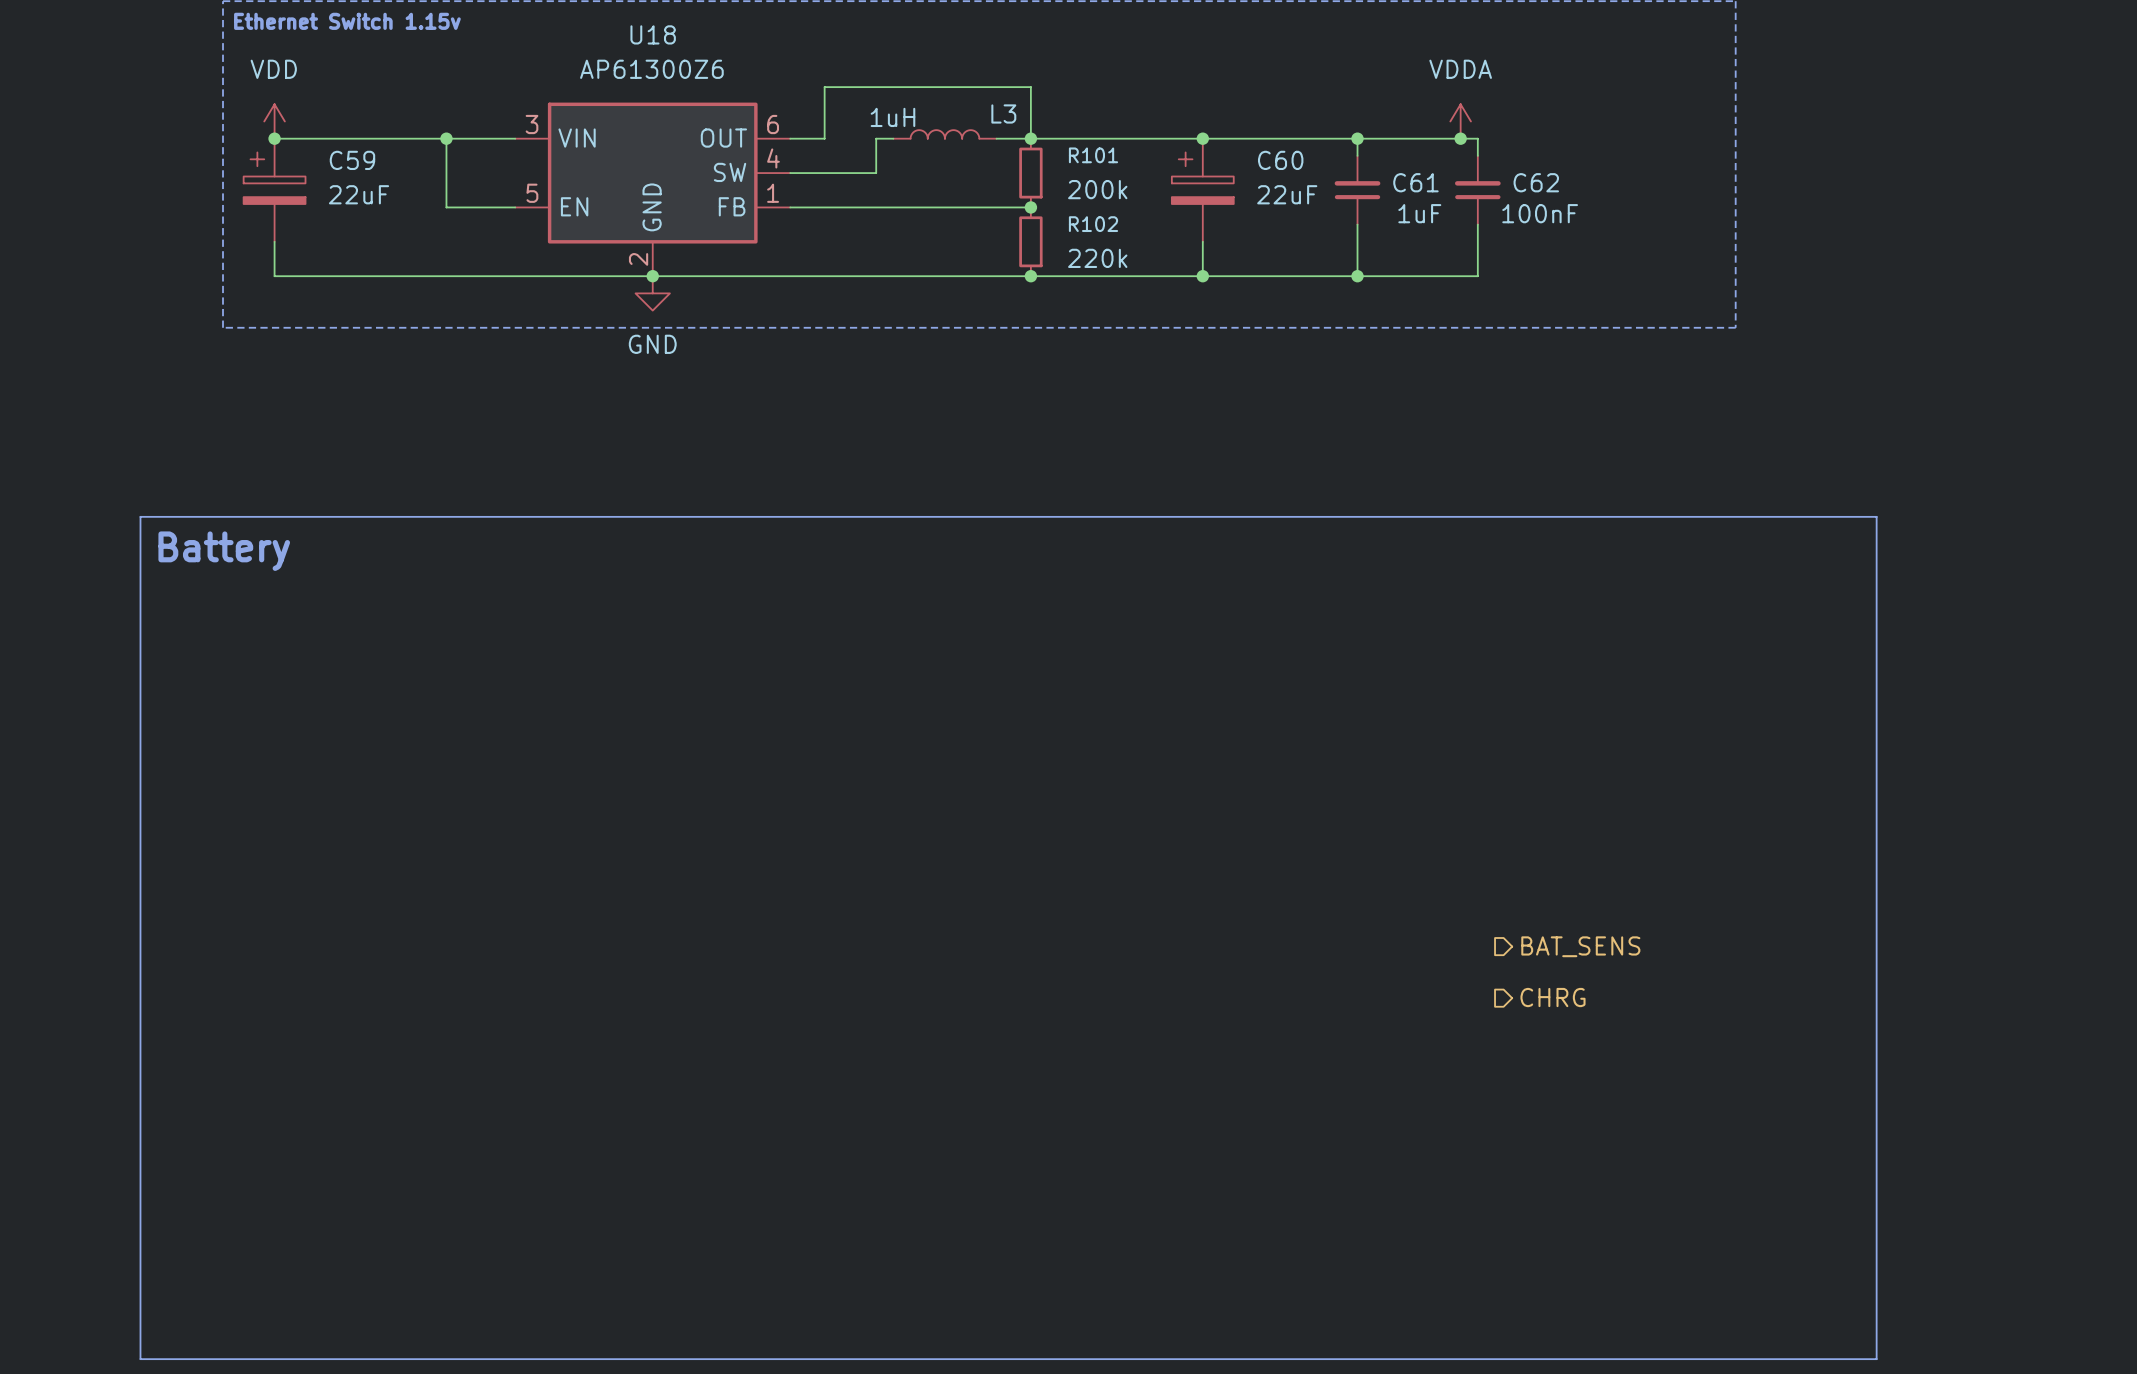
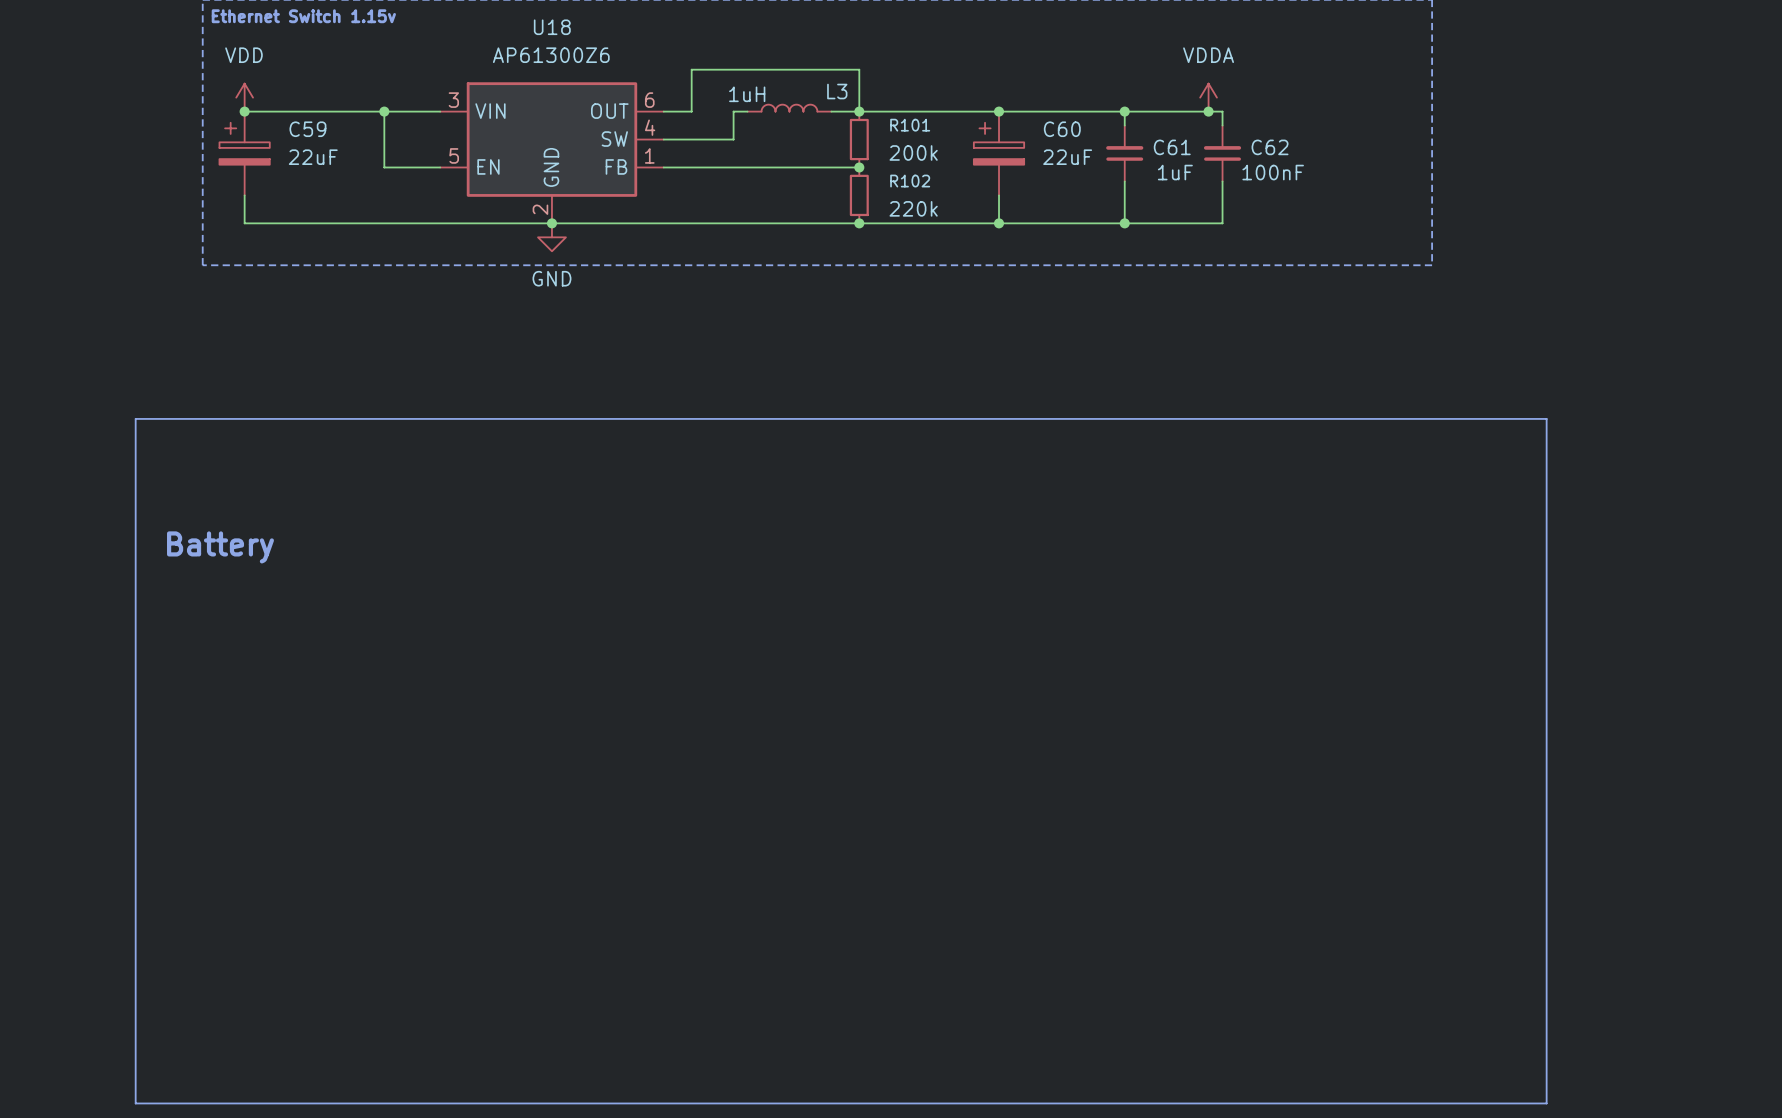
text position: Battery (224, 551) -> Battery (220, 547)
hierarchical label: BAT_SENS (1580, 946) -> none
hierarchical label: CHRG (1553, 997) -> none

